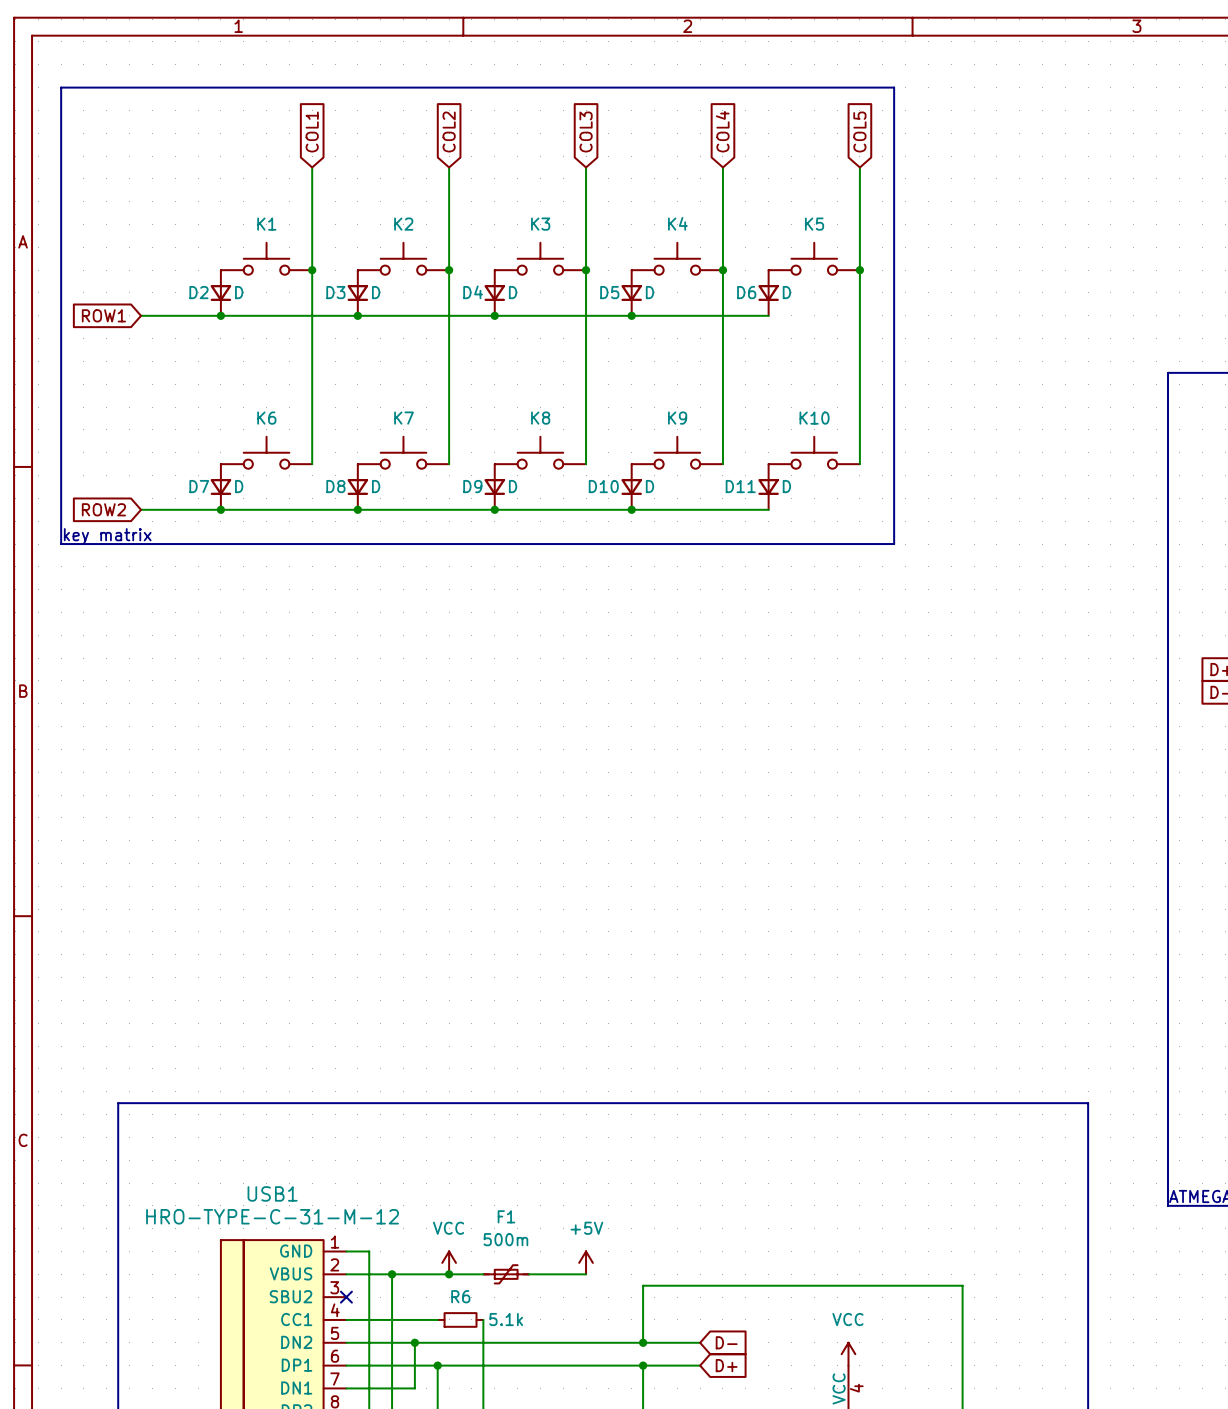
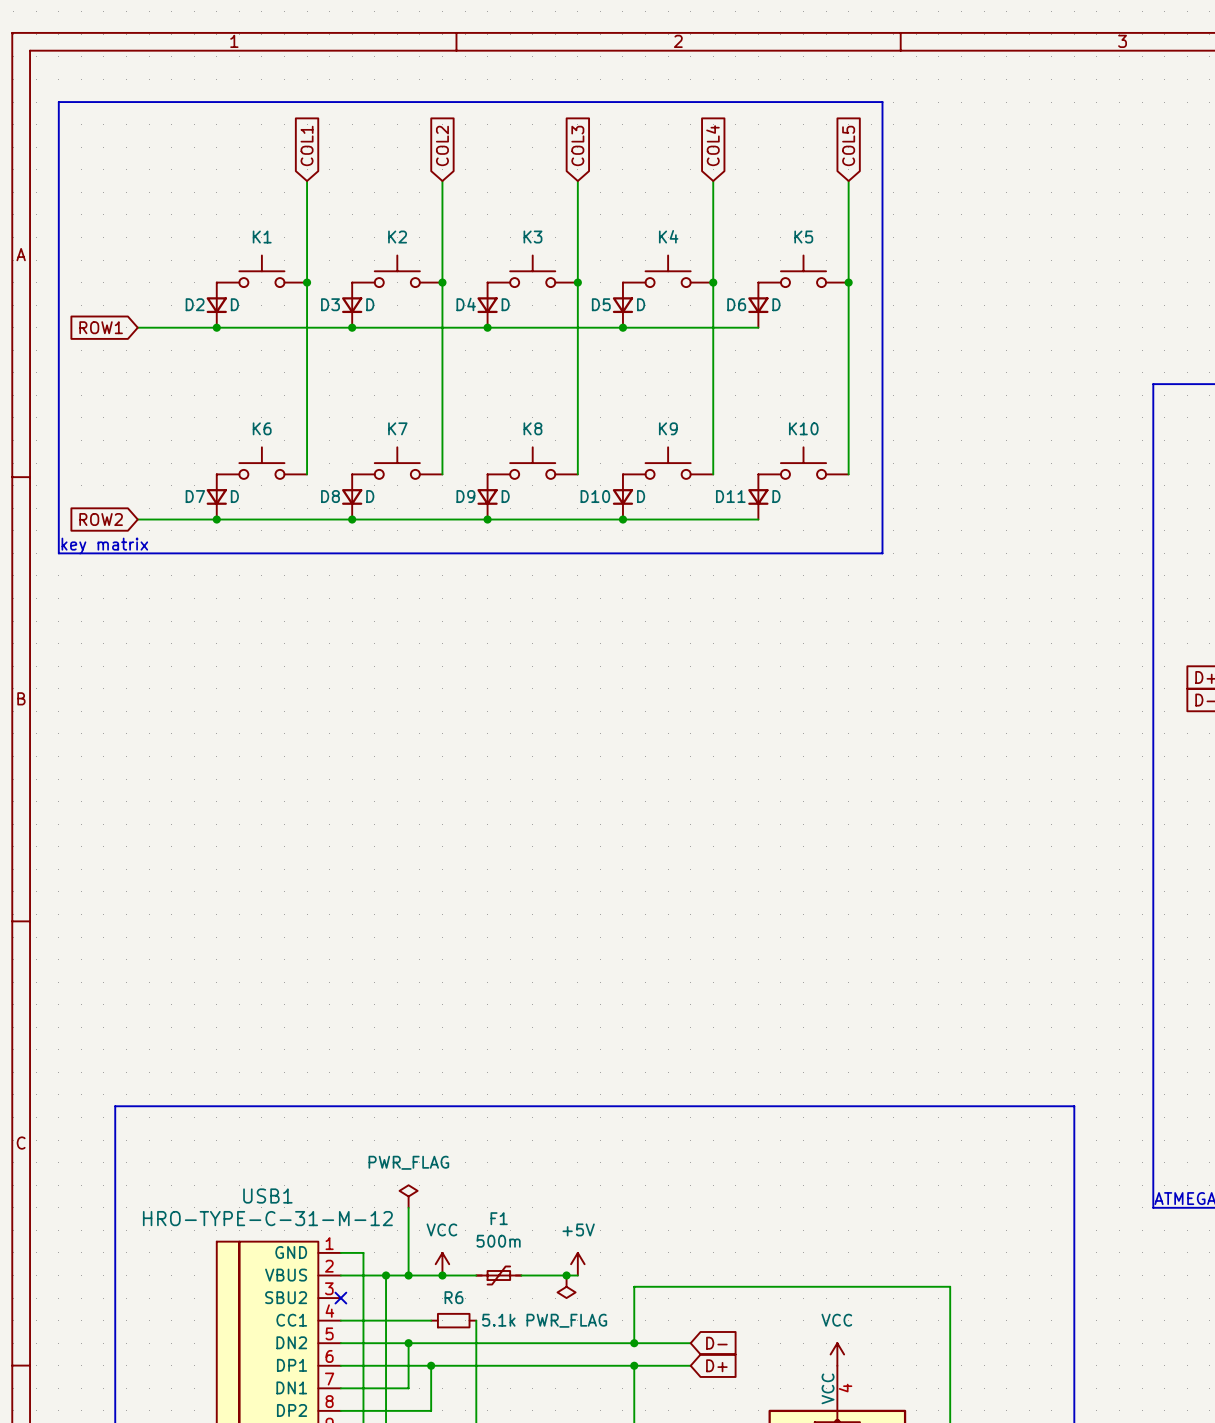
power symbol: none -> PWR_FLAG (408, 1196)
wire: none -> (408, 1207) (408, 1275)
junction: none -> (408, 1275)
junction: none -> (566, 1275)
power symbol: none -> PWR_FLAG (566, 1286)

